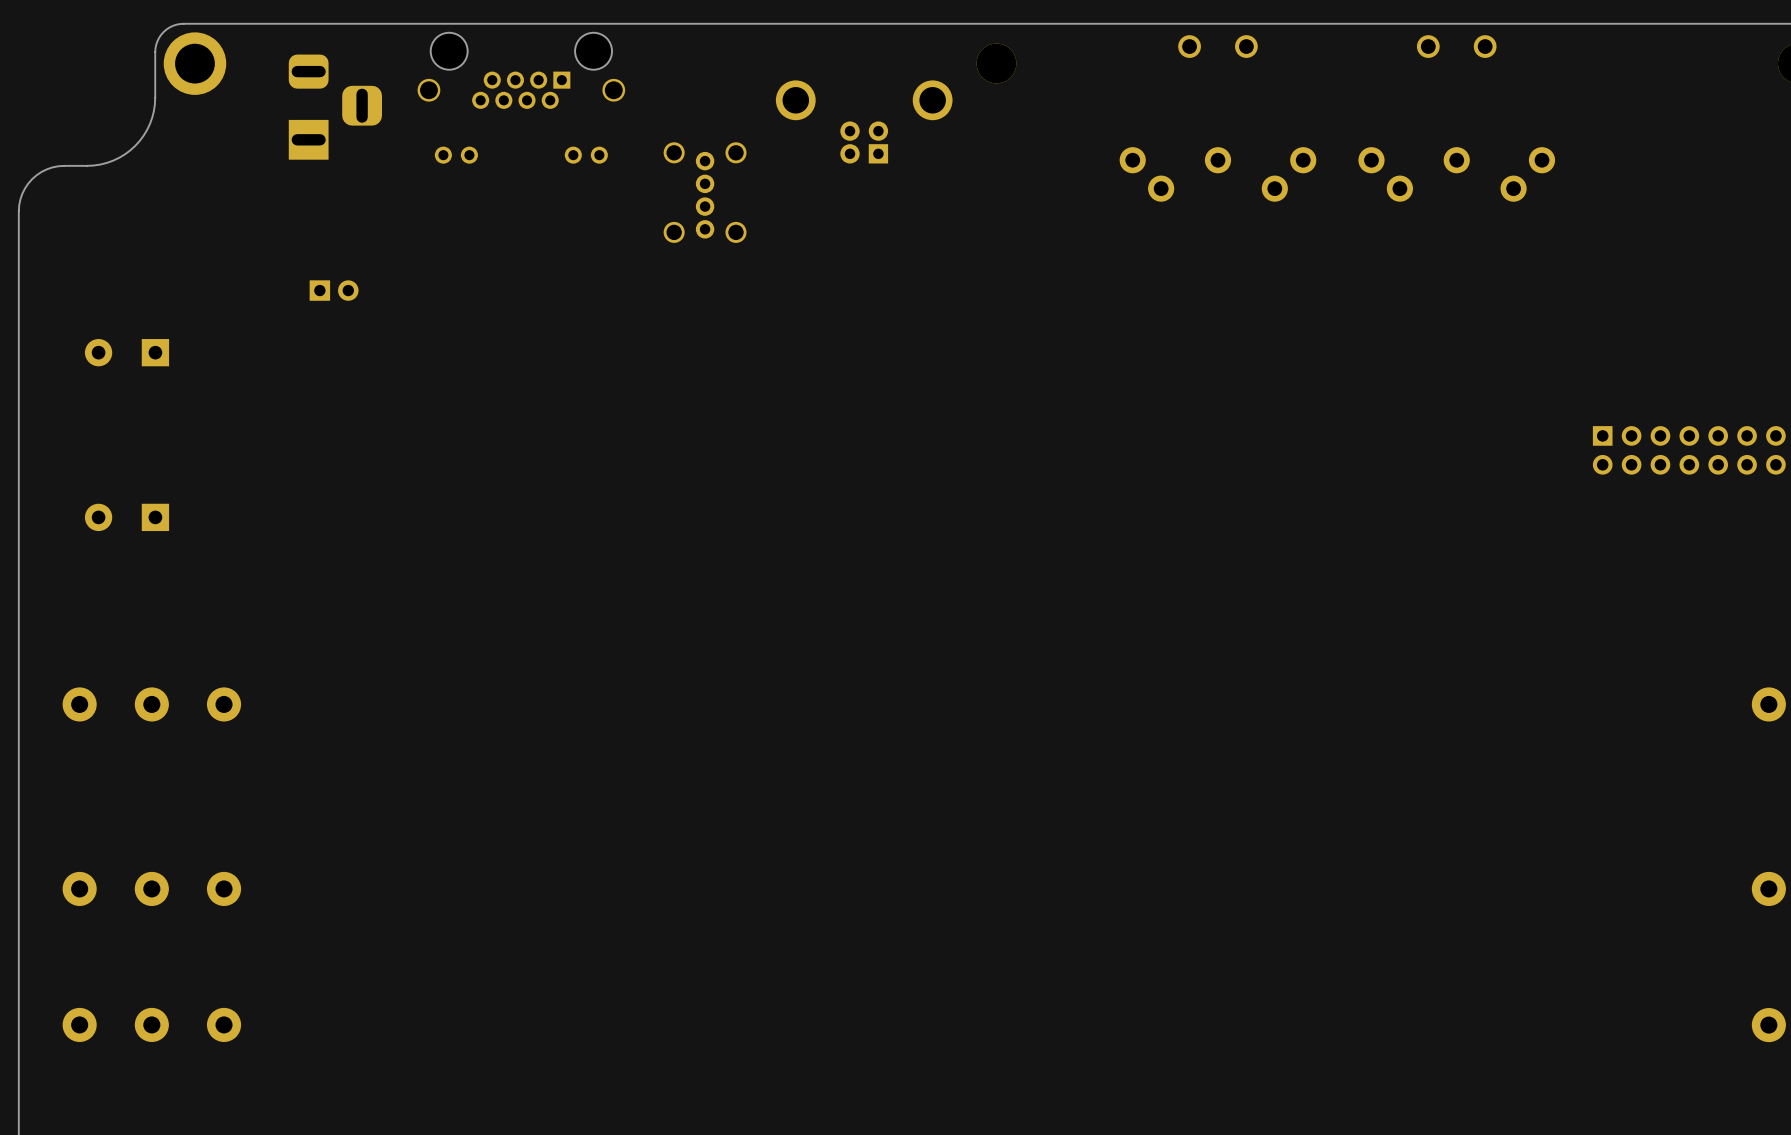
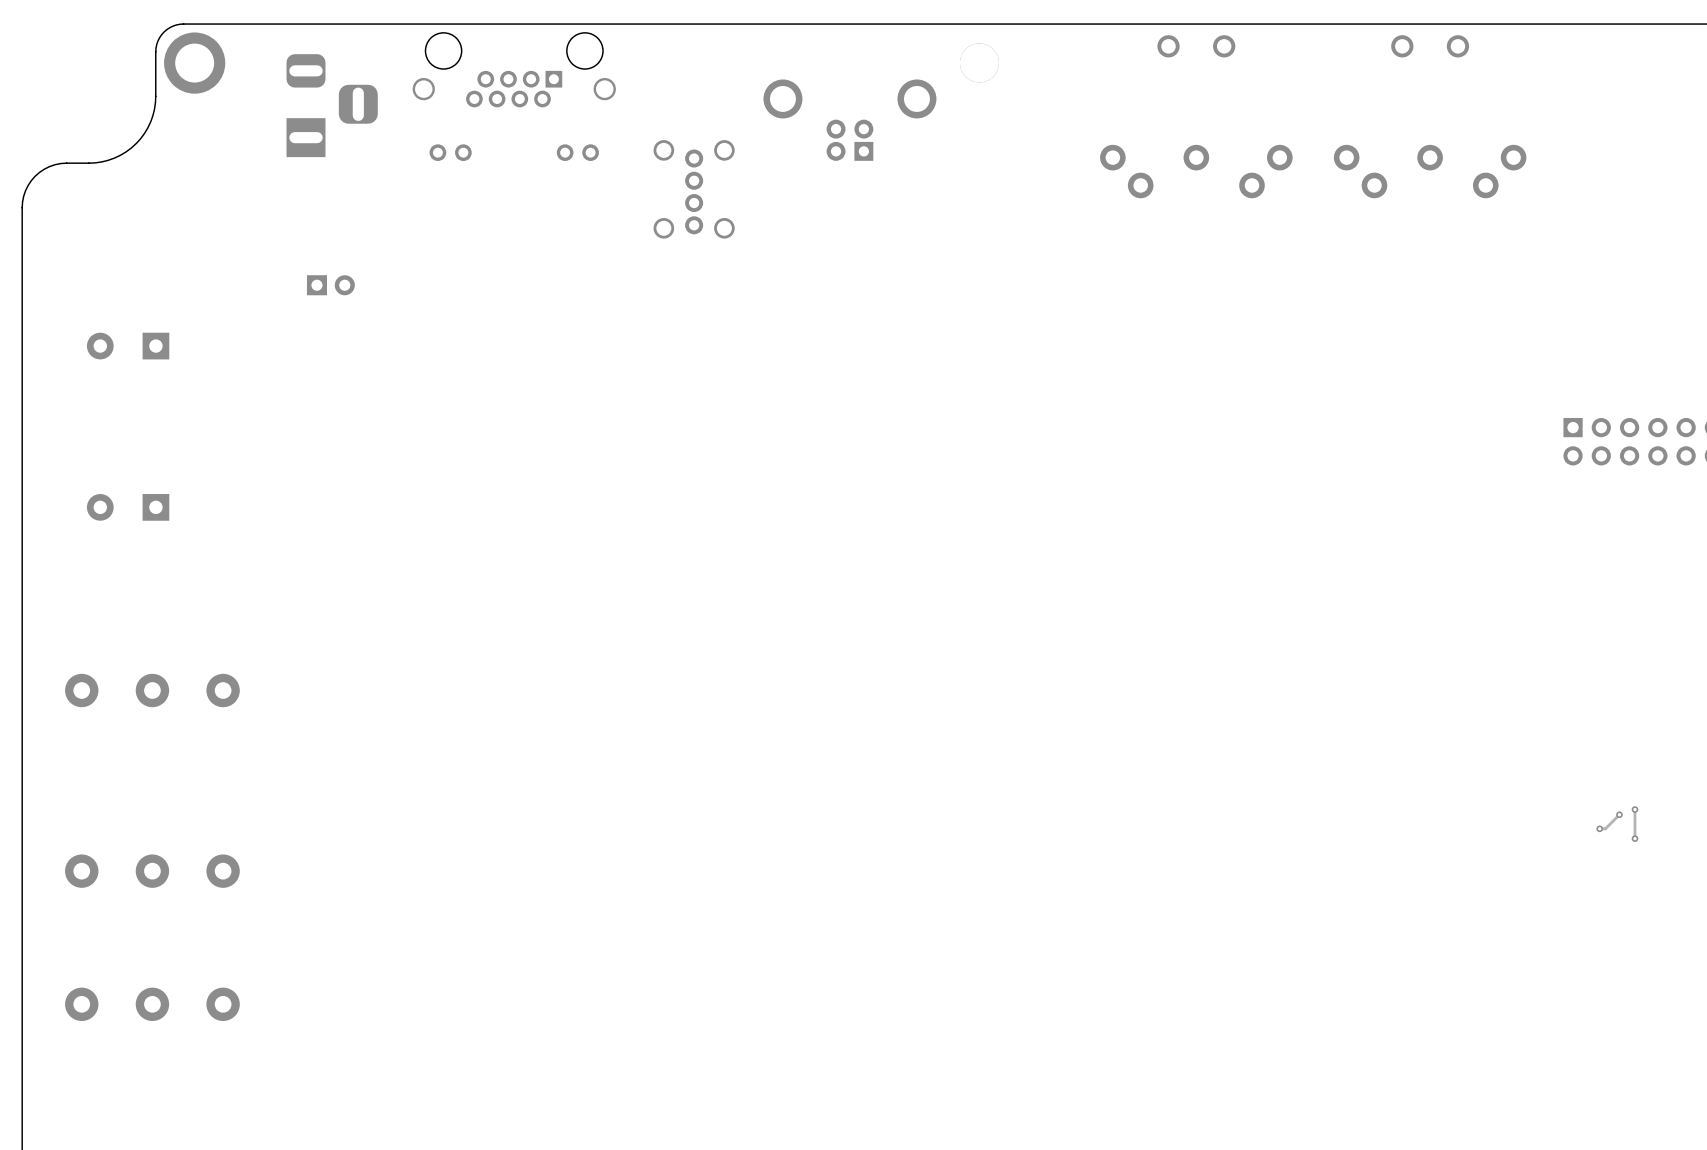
track: none -> (1634, 809) (1634, 838)
via: none -> (1634, 809)
track: none -> (1619, 814) (1605, 828) (1599, 828)
via: none -> (1619, 814)
via: none -> (1599, 828)
via: none -> (1634, 838)

